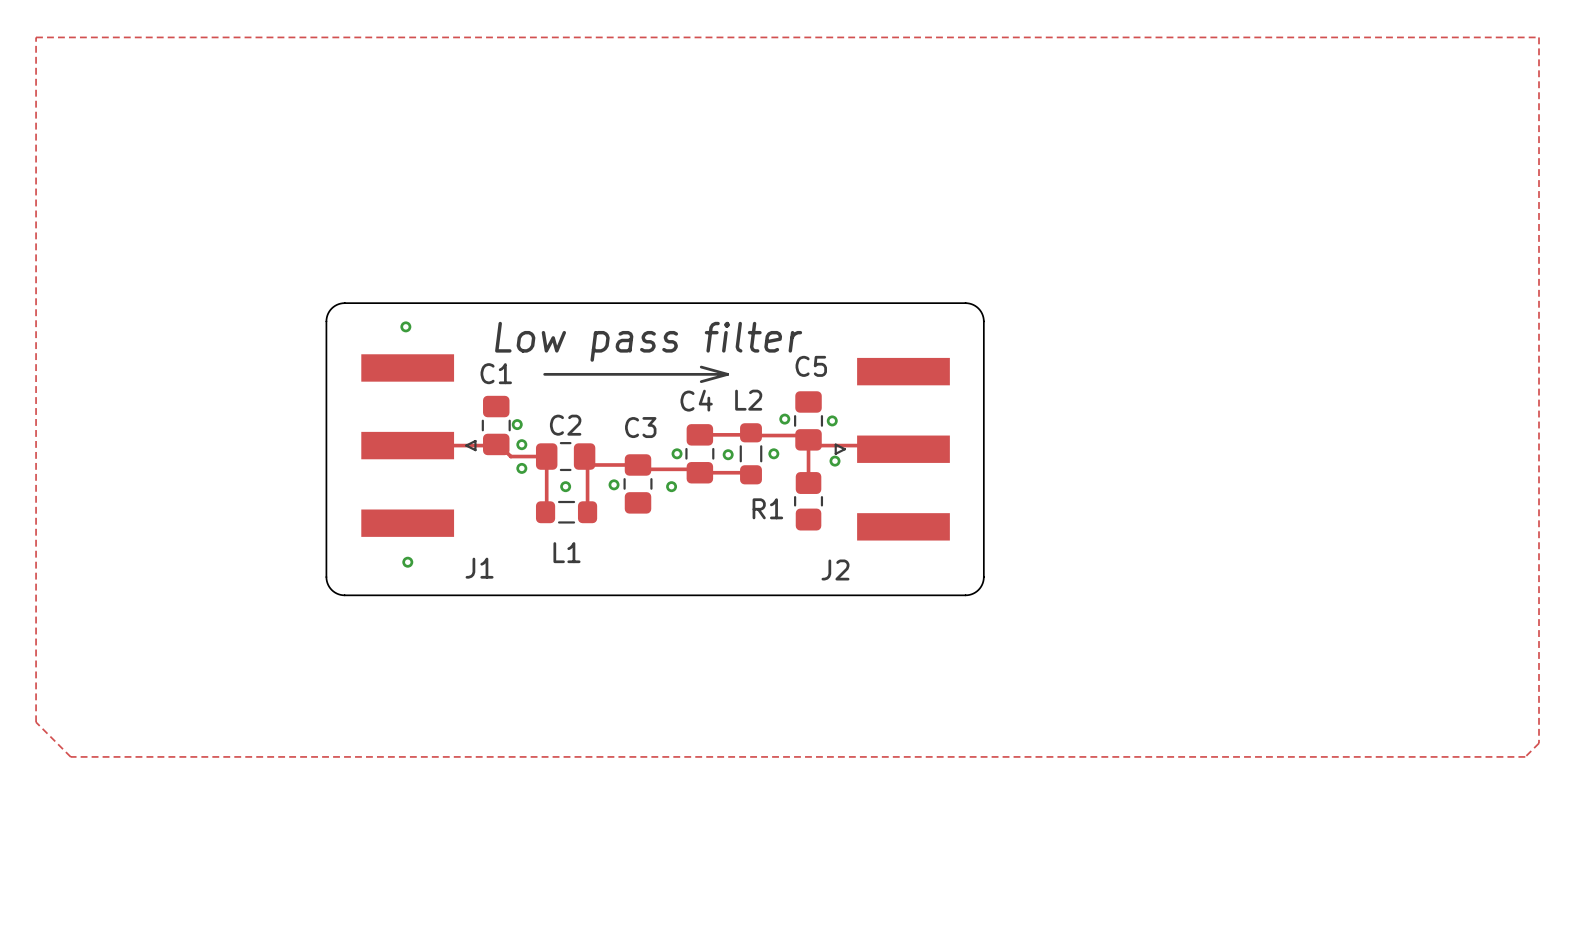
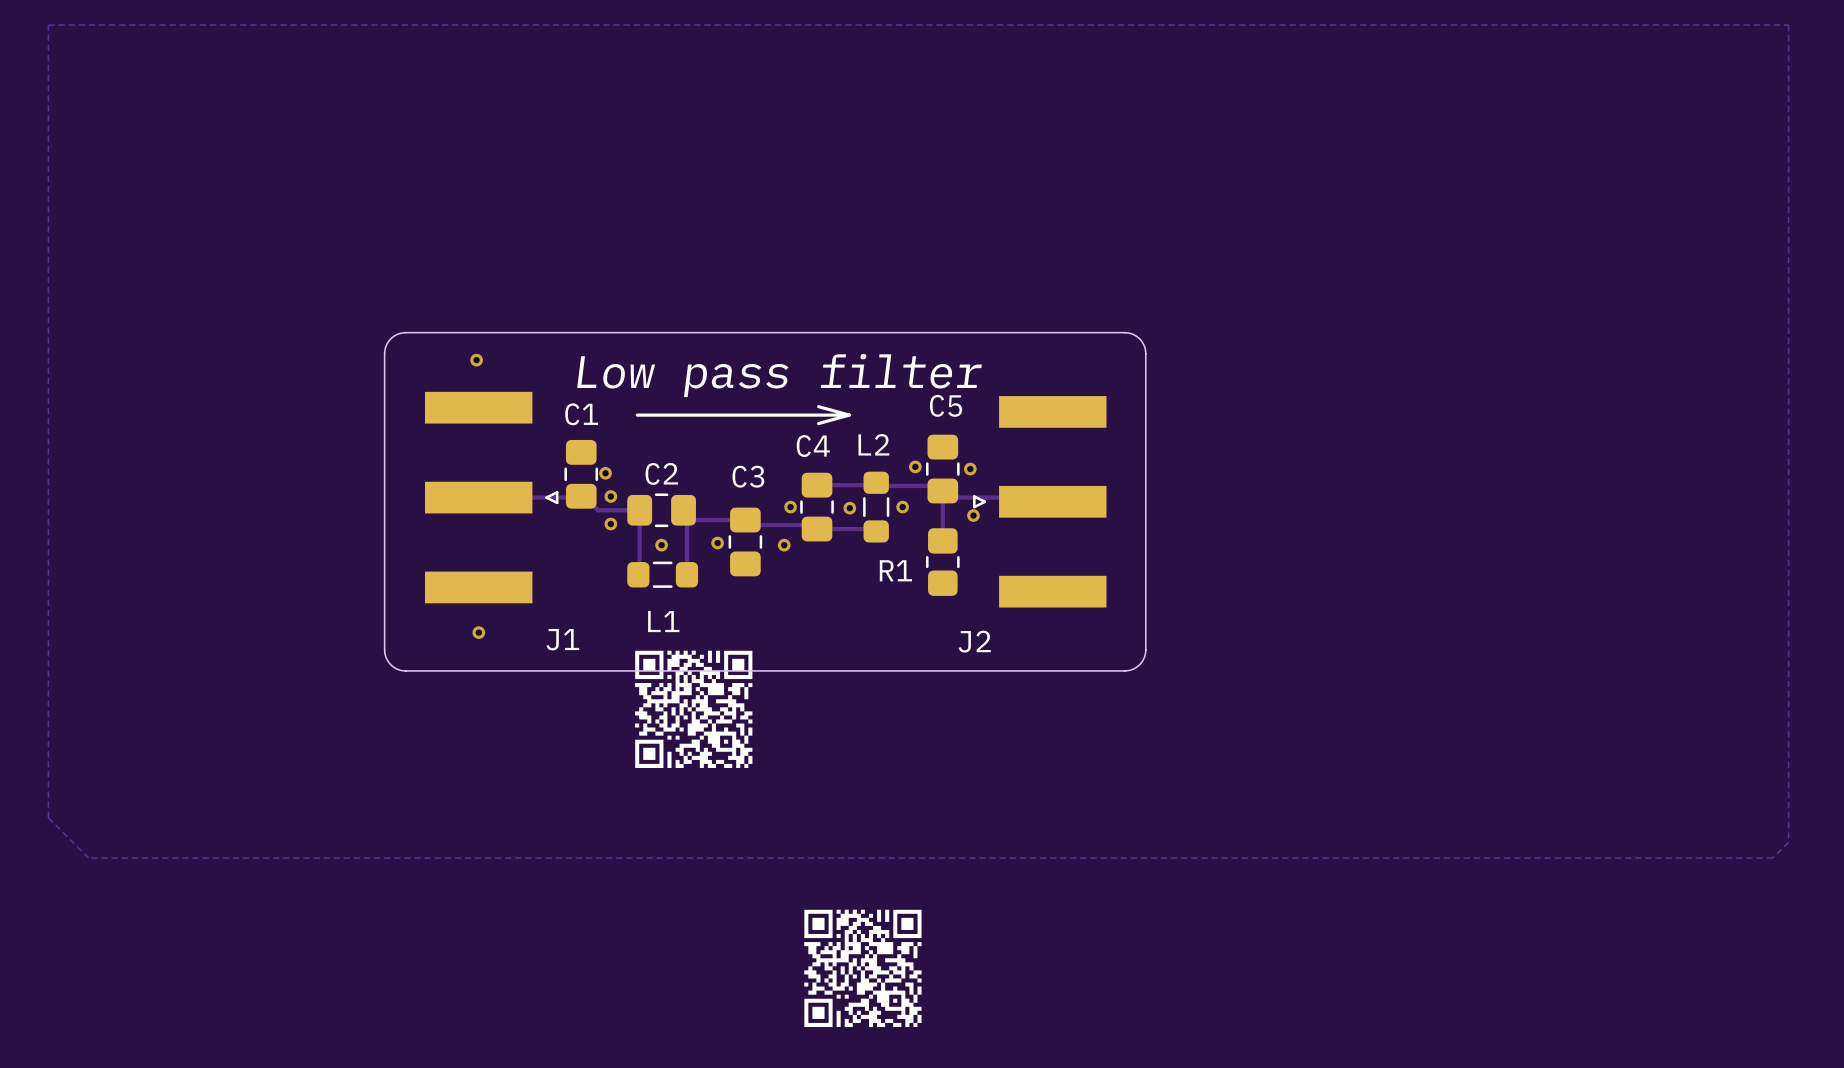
drawing: none -> [635, 650, 753, 768]
drawing: none -> [804, 909, 922, 1028]

